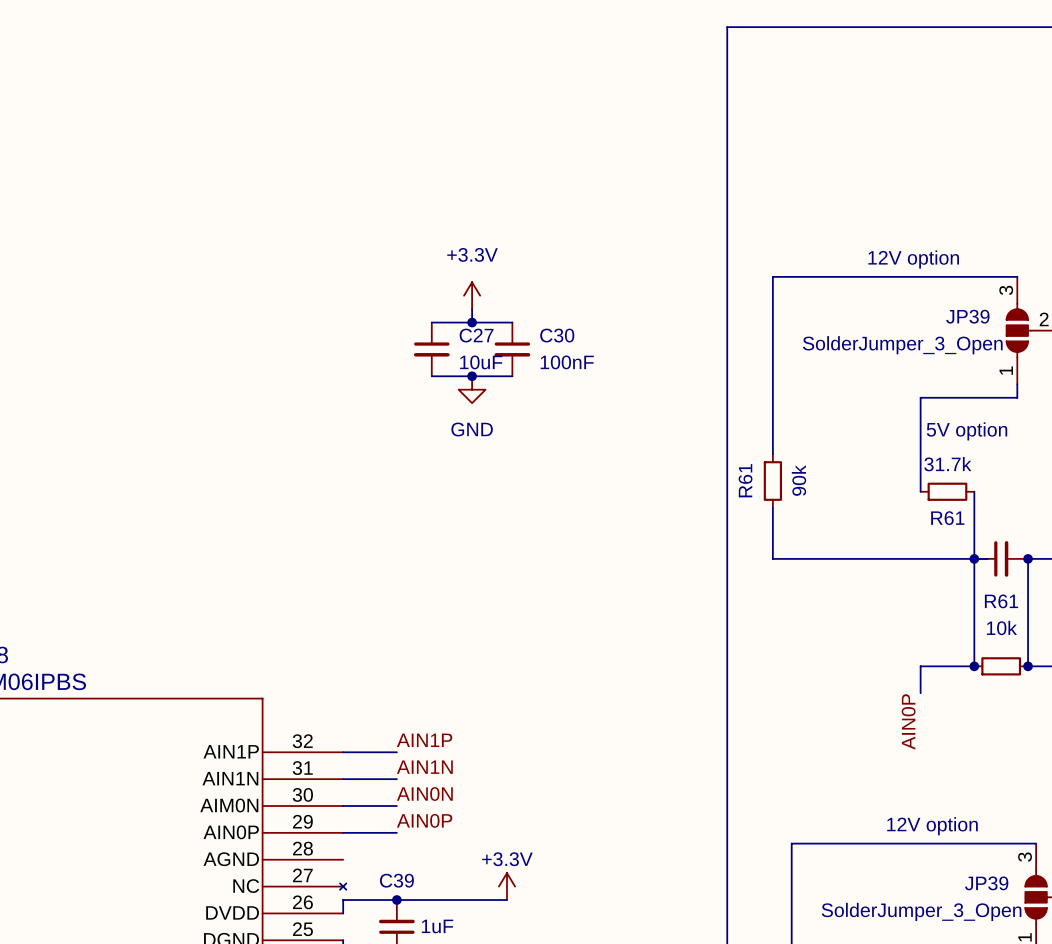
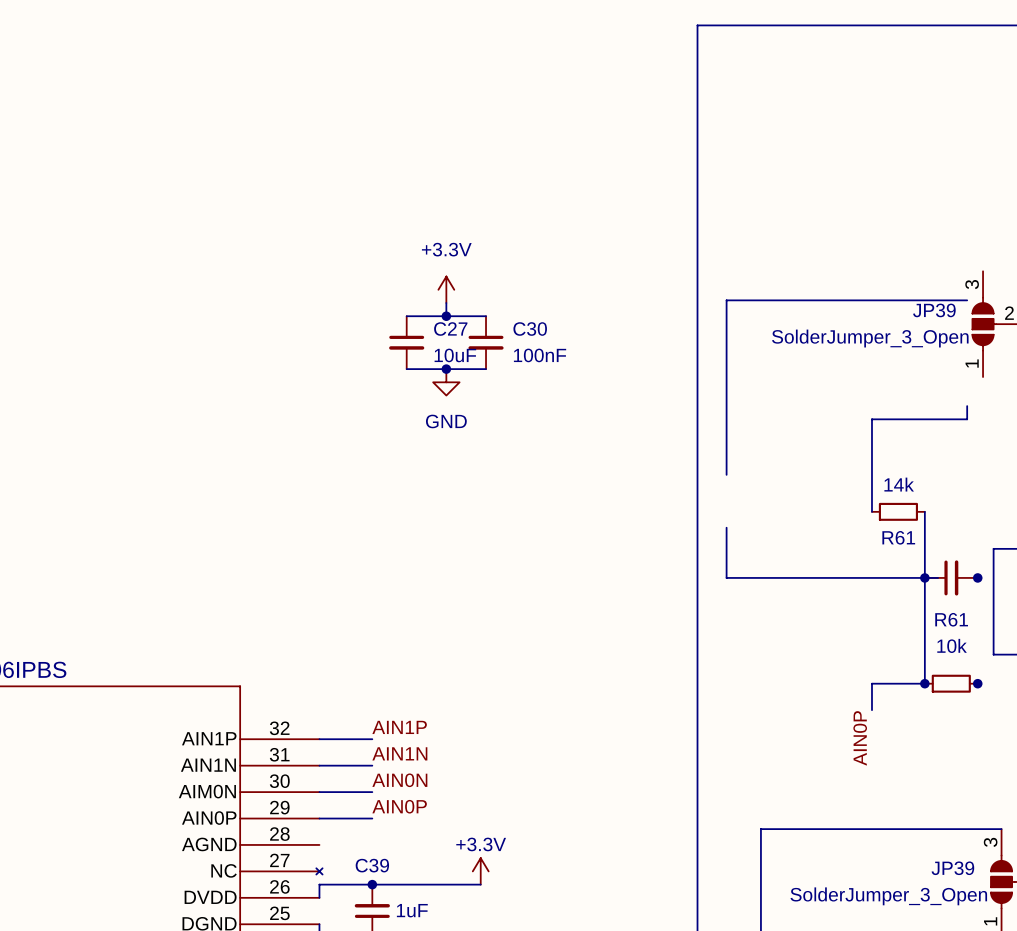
text: 12V option (913, 259) -> none
wire: (1017, 276) (772, 276) (772, 454) -> (967, 300) (726, 300) (726, 474)
wire: (1017, 384) (1017, 397) (920, 397) (920, 491) -> (967, 406) (967, 419) (871, 419) (871, 511)
text: 5V option (966, 431) -> none
R61: 90k (772, 481) -> none
R61: 31.7k (947, 491) -> none
wire: (974, 491) (974, 666) (920, 666) (920, 693) -> (924, 511) (924, 683) (871, 683) (871, 710)
wire: (772, 507) (772, 558) (987, 558) -> (726, 527) (726, 577) (938, 577)
R61: none -> 14k (898, 511)
junction: (974, 558) -> none
part position: (1001, 558) -> (951, 577)
junction: (1028, 558) -> none
junction: none -> (924, 577)
junction: none -> (977, 577)
junction: (974, 666) -> none
R61 position: (1001, 666) -> (951, 683)
junction: (1028, 666) -> none
junction: none -> (924, 683)
junction: none -> (977, 683)
label position: AIN0P (908, 721) -> AIN0P (860, 738)
text: 12V option (932, 826) -> none

